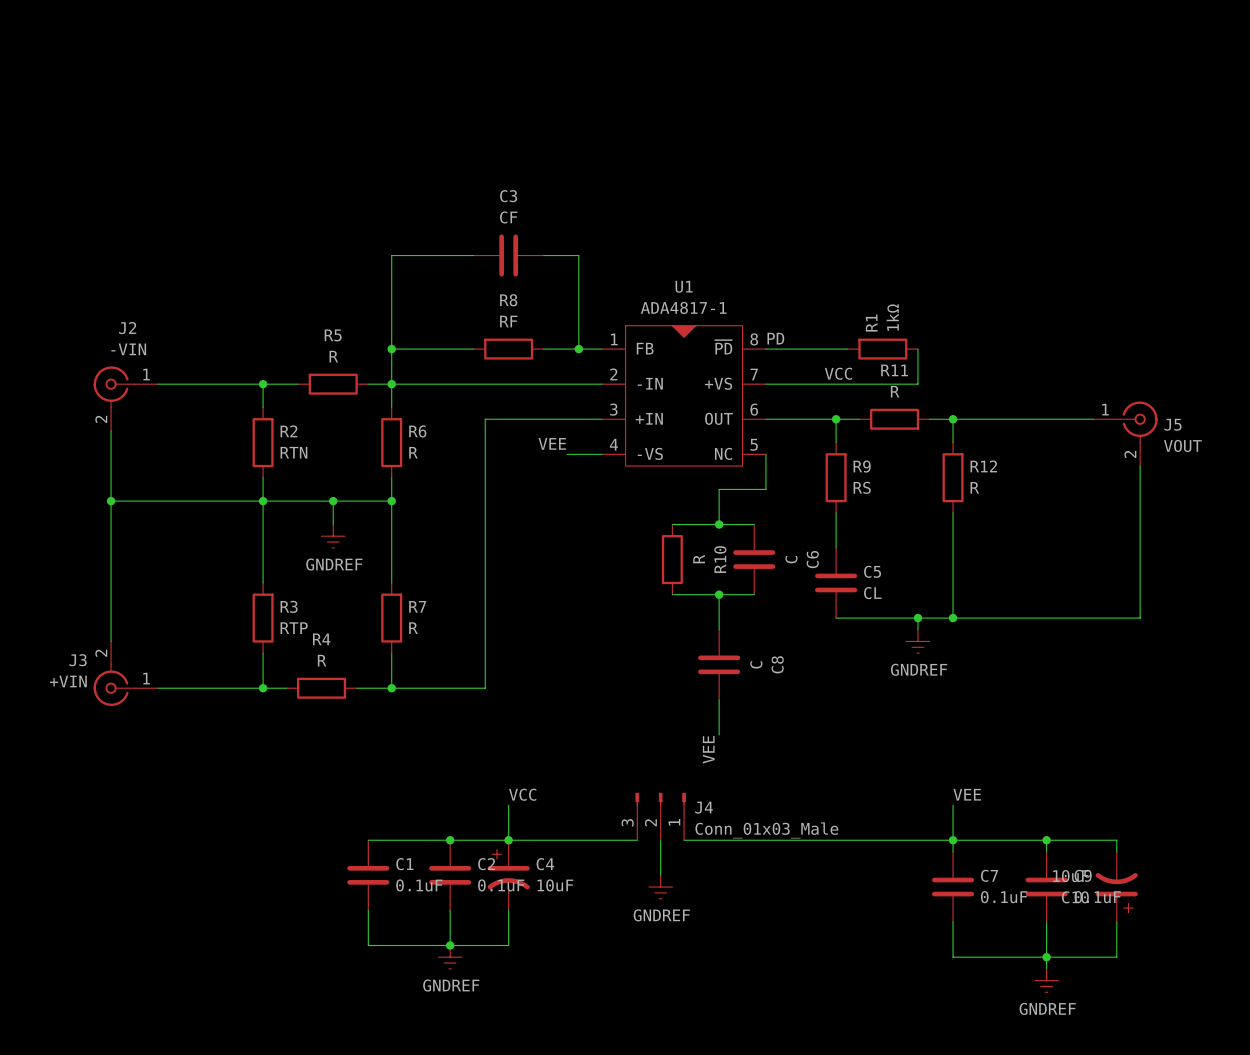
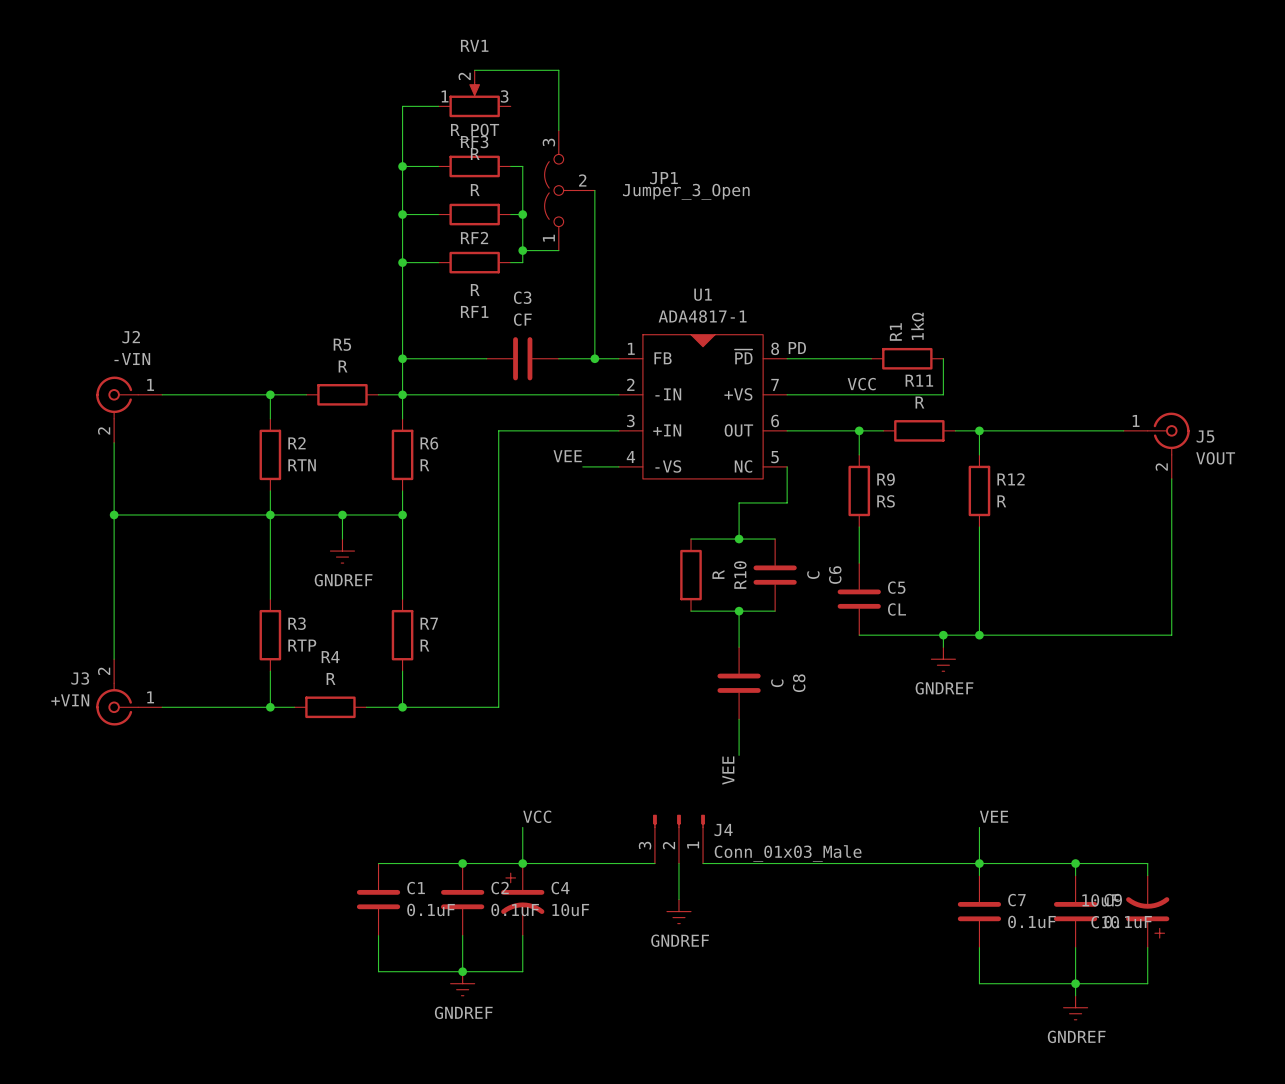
wire: none -> (474, 70) (558, 70) (558, 130)
RV1: none -> R_POT (474, 93)
wire: none -> (438, 106) (402, 106) (402, 262)
wire: none -> (402, 166) (438, 166)
junction: none -> (402, 166)
RF3: none -> R (474, 166)
wire: none -> (510, 166) (522, 166) (522, 262) (510, 262)
JP1: none -> Jumper_3_Open (569, 190)
wire: none -> (402, 214) (438, 214)
junction: none -> (402, 214)
RF2: none -> R (474, 214)
wire: none -> (510, 214) (522, 214)
junction: none -> (522, 214)
wire: none -> (522, 250) (558, 250)
junction: none -> (522, 250)
junction: none -> (402, 262)
wire: (426, 255) (473, 255) -> none
RF1: none -> R (474, 262)
C3 position: (508, 255) -> (522, 358)
wire: (543, 255) (578, 255) -> (594, 190) (594, 262)
R8: RF (508, 349) -> none

